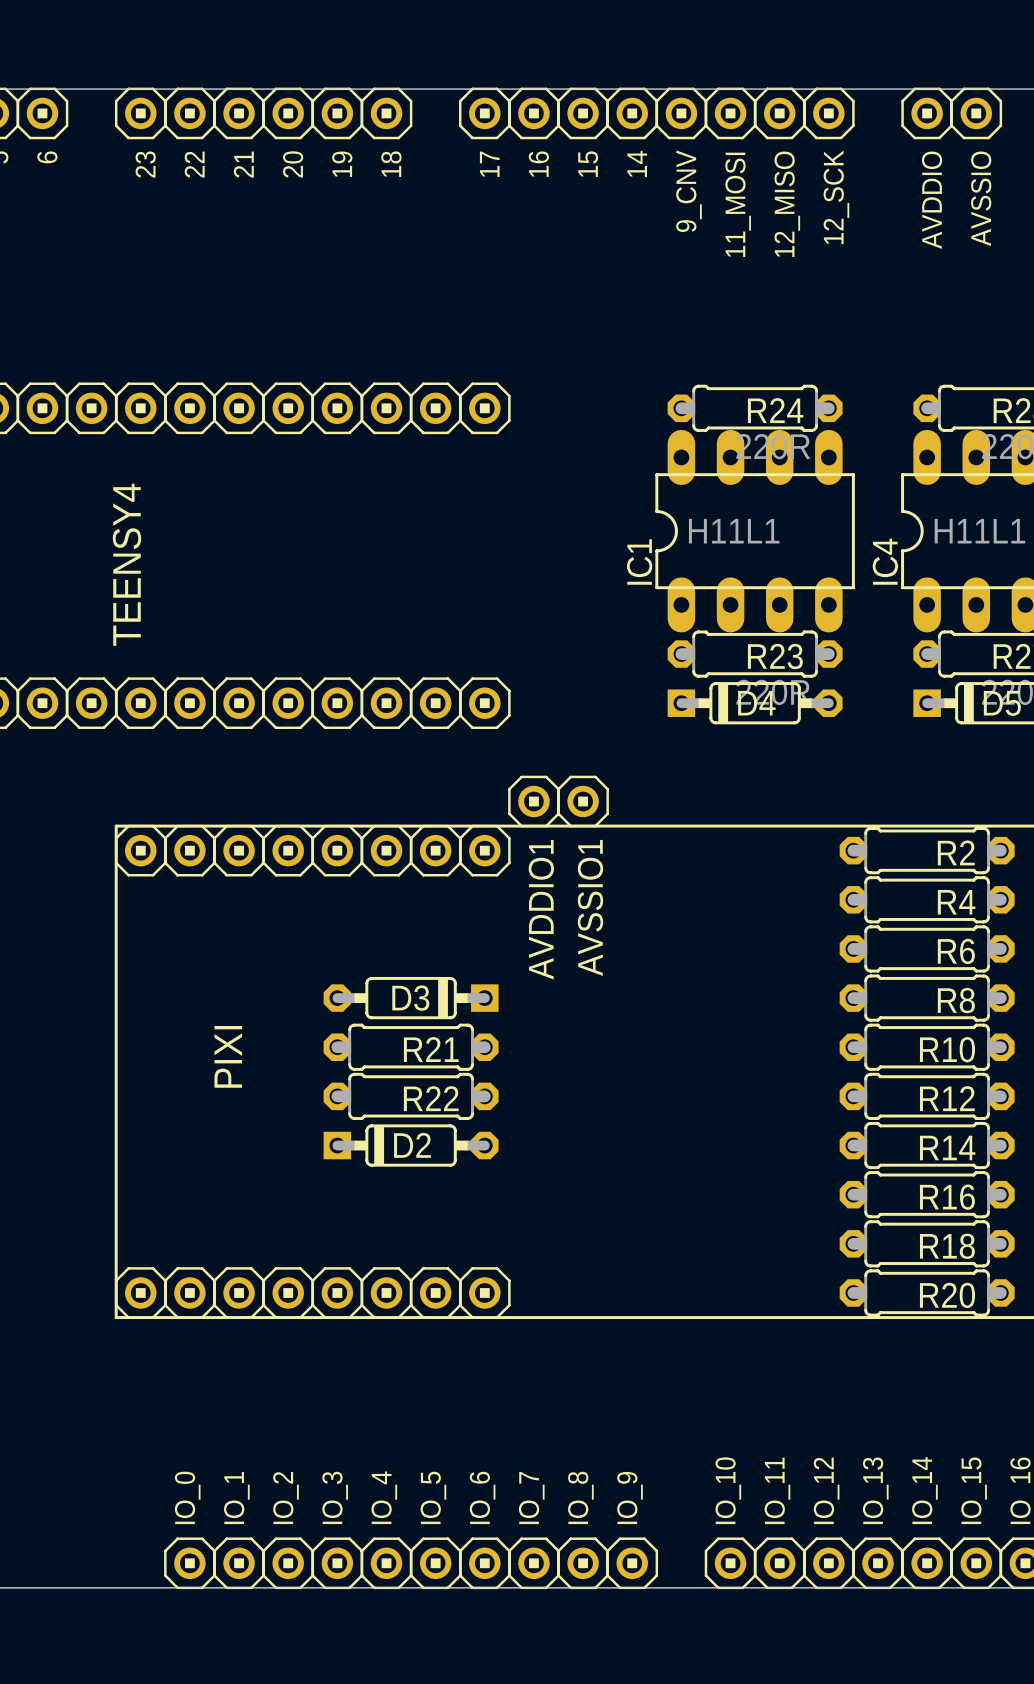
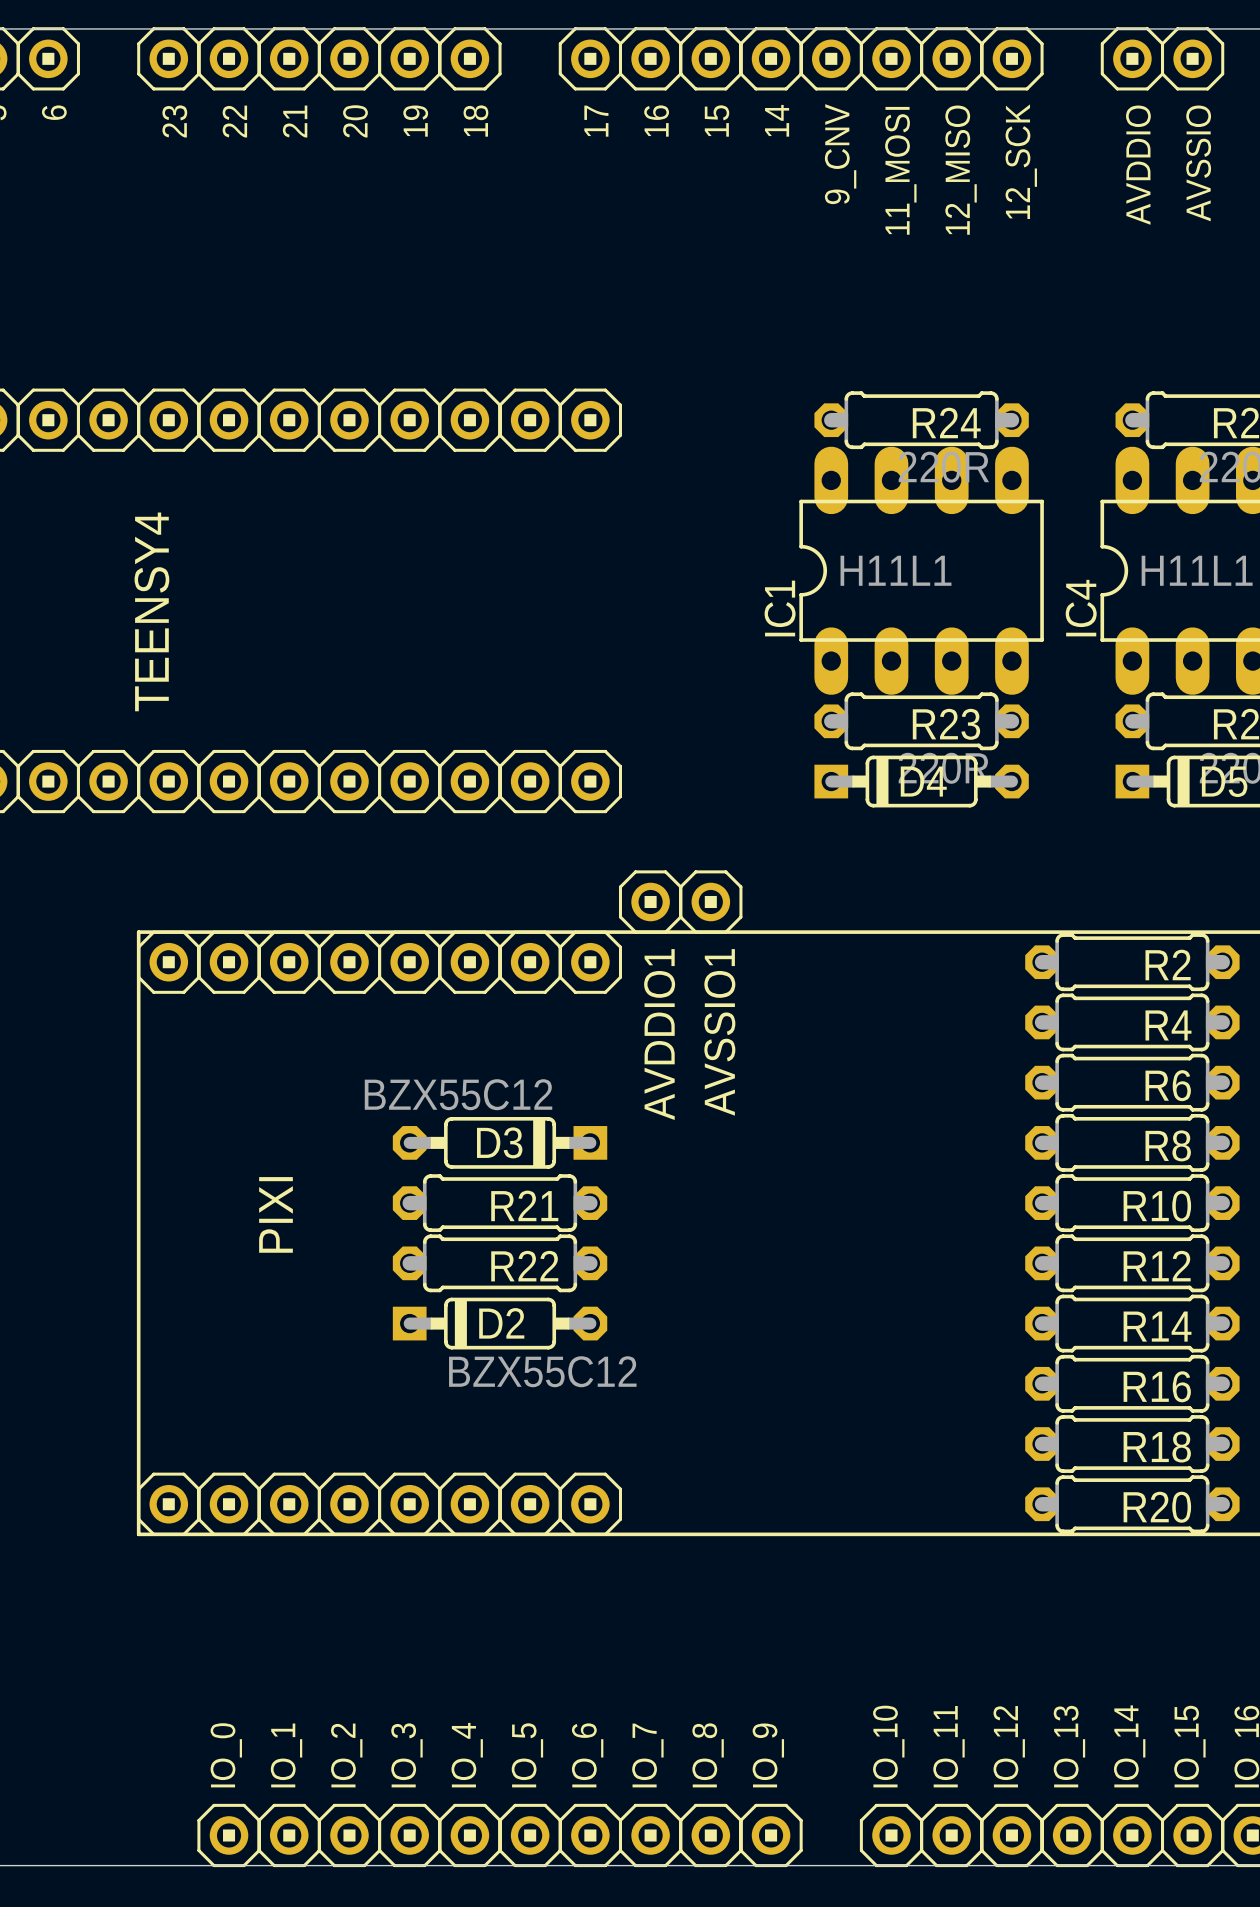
D3 value: none -> BZX55C12 (458, 1094)
D2 value: none -> BZX55C12 (542, 1371)

